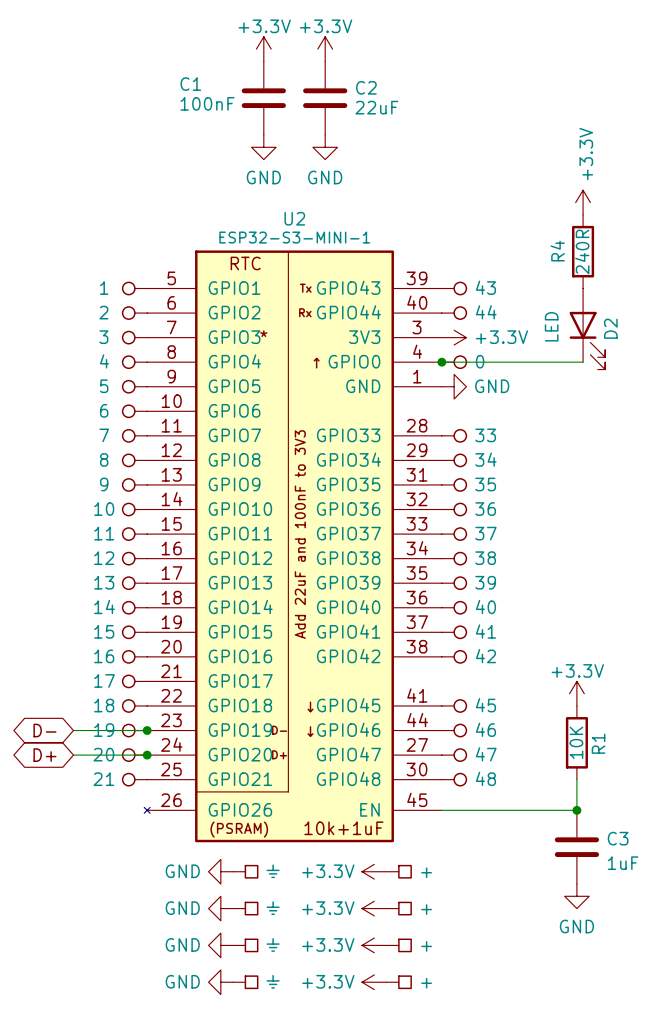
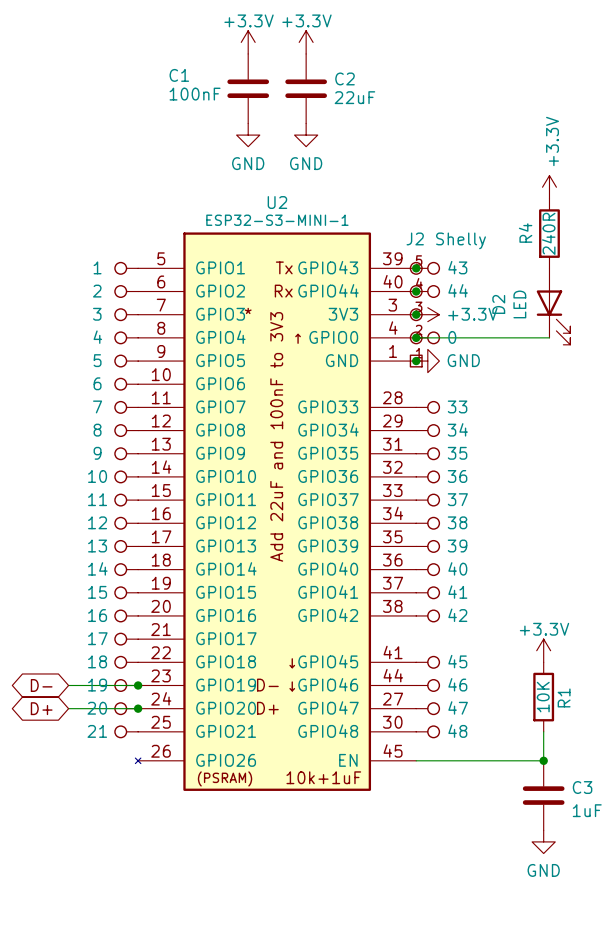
U2 symbol: [144, 250, 442, 843] -> [135, 232, 417, 791]
junction: none -> (416, 268)
junction: none -> (416, 291)
D2 name position: D2 (610, 328) -> D2 (498, 304)
J2: none -> Shelly (416, 314)
junction: none -> (416, 314)
junction: none -> (416, 361)
power symbol: GND (220, 871) -> none
part: ⏚ (245, 871) -> none
power symbol: +3.3V (374, 871) -> none
part: + (399, 871) -> none
power symbol: GND (220, 908) -> none
part: ⏚ (245, 908) -> none
power symbol: +3.3V (374, 908) -> none
part: + (399, 908) -> none
power symbol: GND (220, 945) -> none
part: ⏚ (245, 945) -> none
power symbol: +3.3V (374, 945) -> none
part: + (399, 945) -> none
power symbol: GND (220, 982) -> none
part: ⏚ (245, 982) -> none
power symbol: +3.3V (374, 982) -> none
part: + (399, 982) -> none

